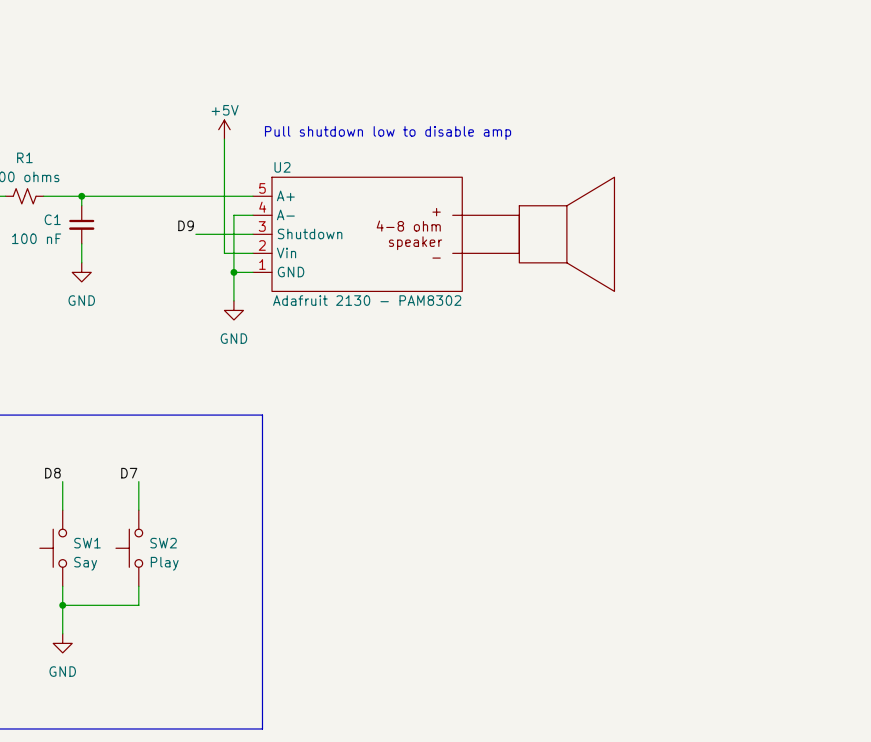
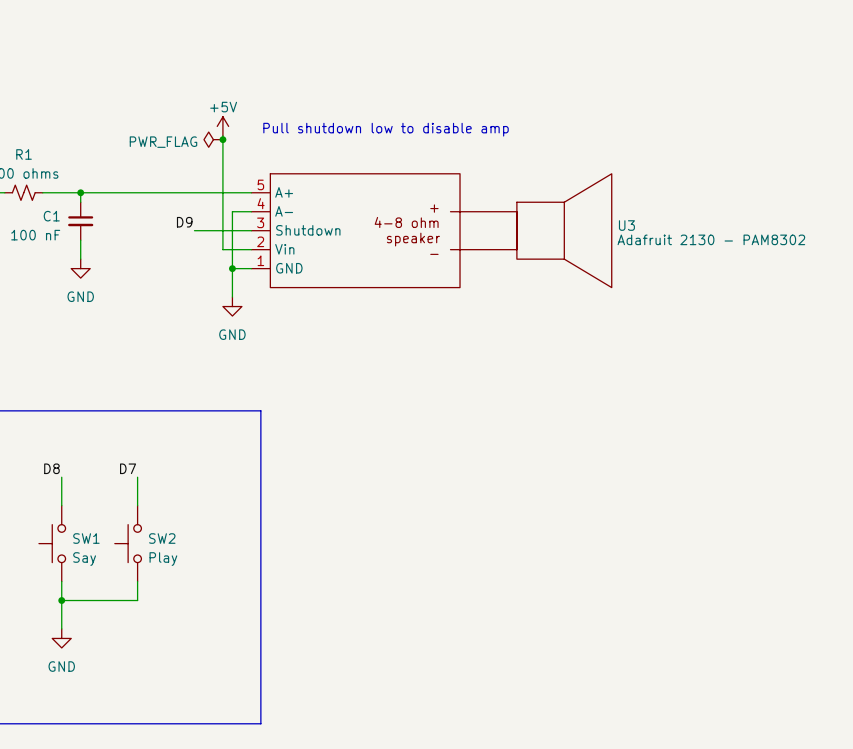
power symbol: none -> PWR_FLAG (213, 139)
junction: none -> (222, 139)
U2 name: U2 (282, 167) -> U3 (626, 225)
U2 value position: Adafruit 2130 - PAM8302 (367, 300) -> Adafruit 2130 - PAM8302 (711, 239)

